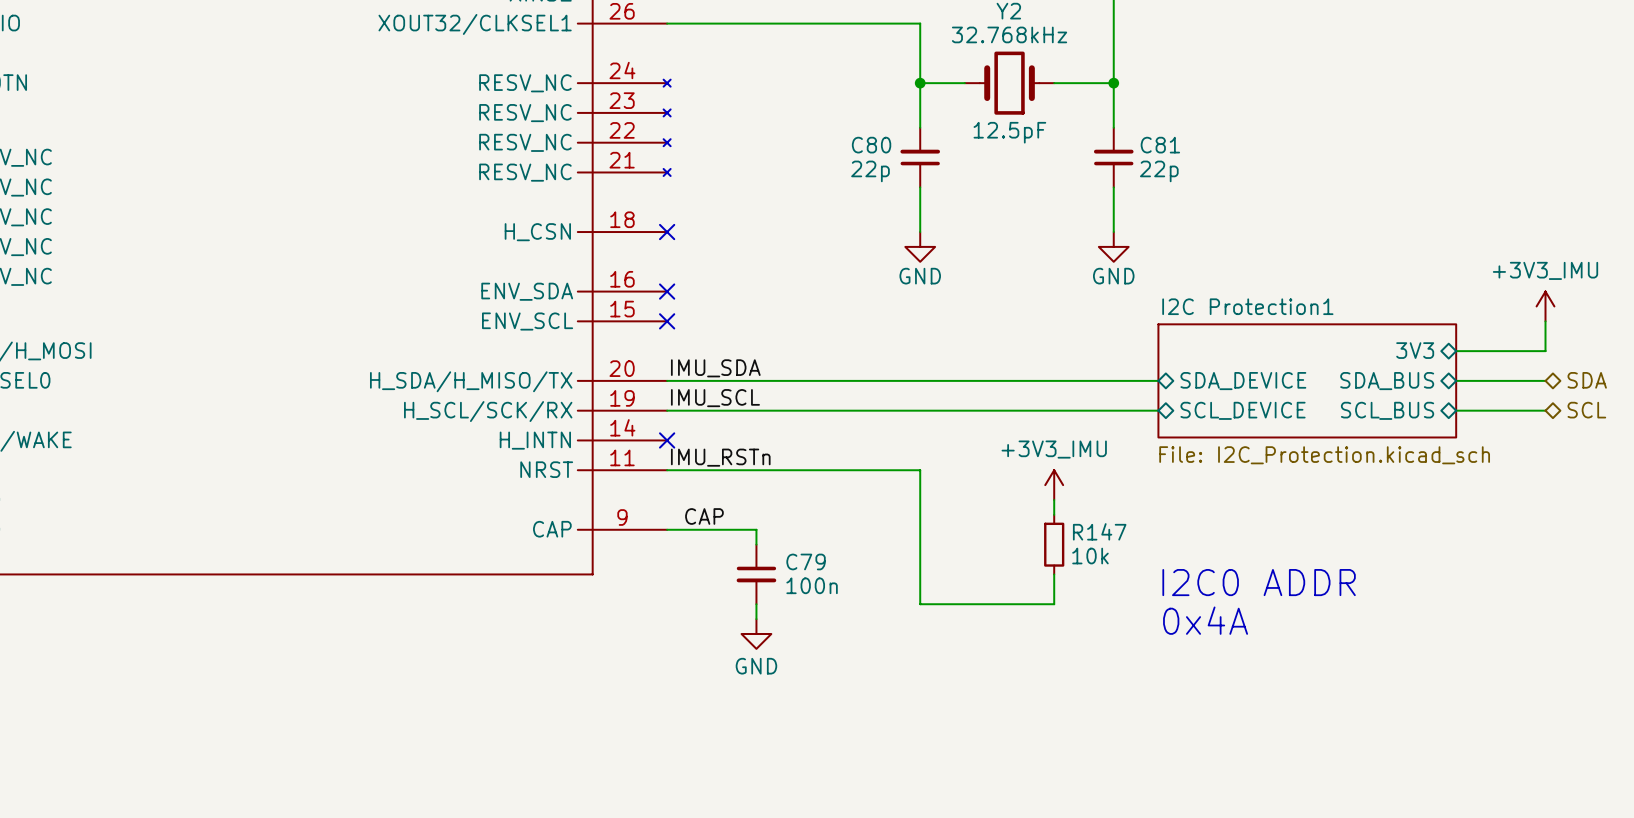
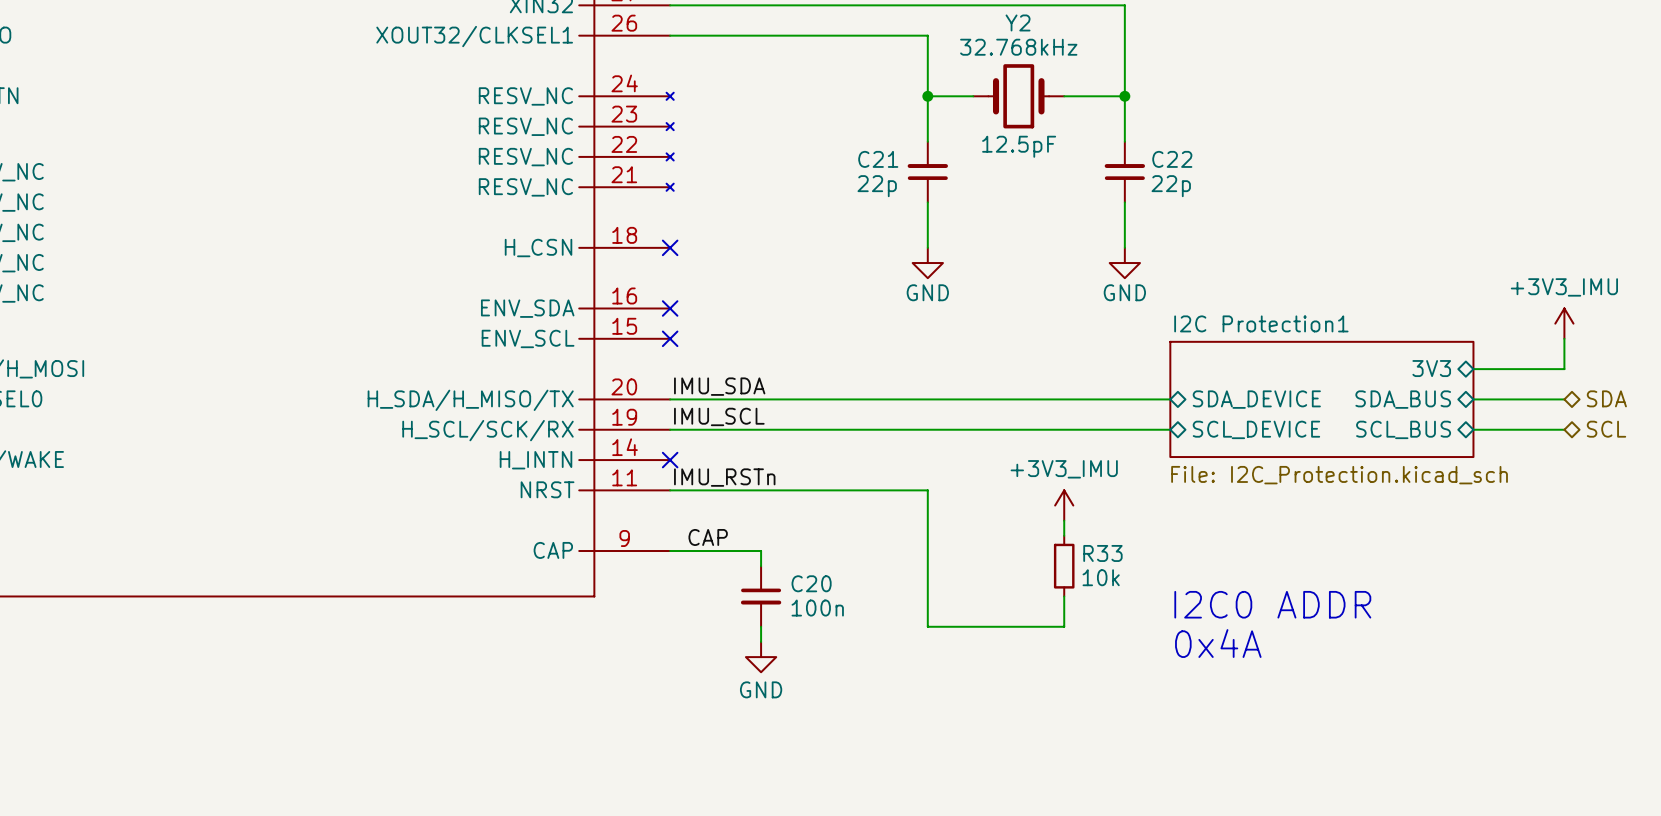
C80 name: C80 (871, 145) -> C21 (878, 159)
C81 name: C81 (1160, 145) -> C22 (1172, 159)
R147 name: R147 (1099, 531) -> R33 (1102, 553)
C79 name: C79 (806, 561) -> C20 (811, 583)

